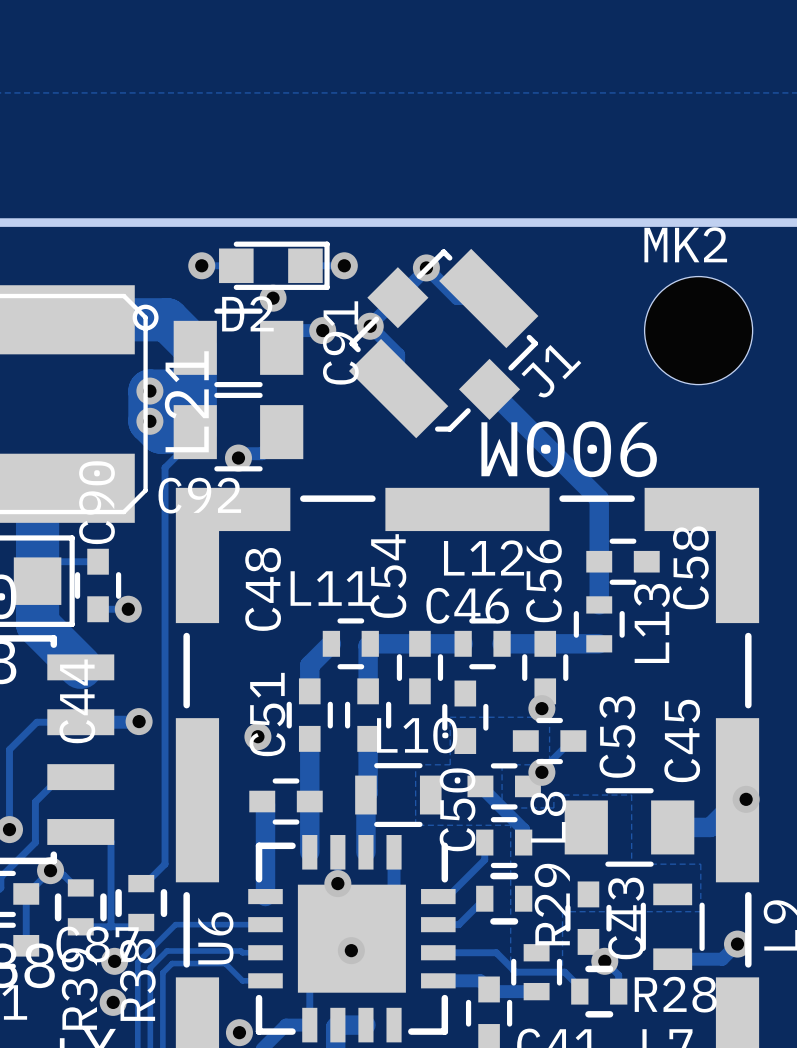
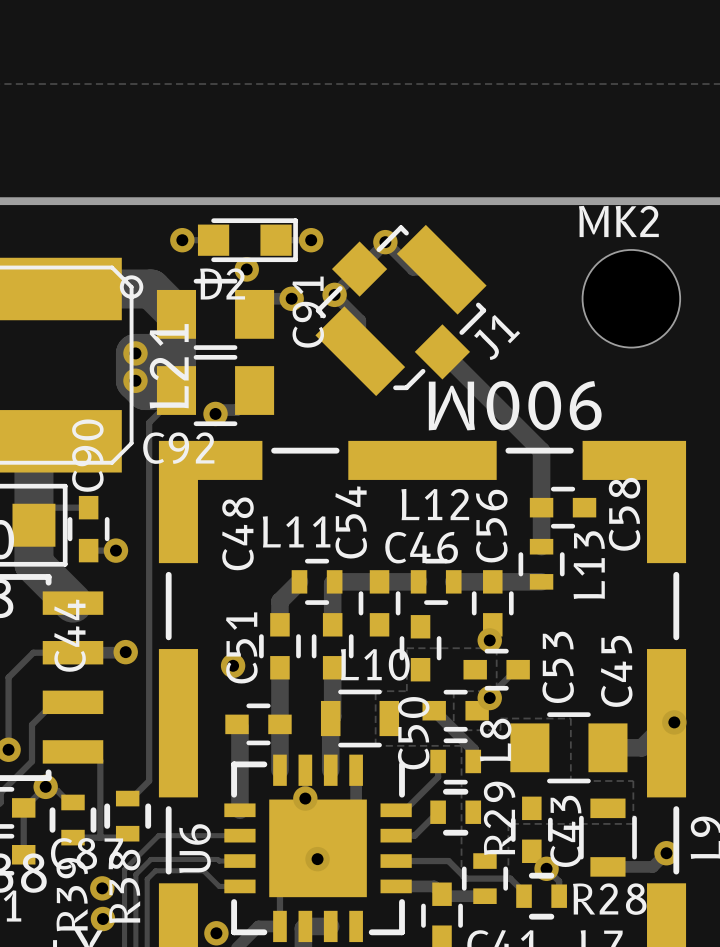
via: (114, 961) -> none
via: none -> (102, 888)
via: (113, 1002) -> none
via: none -> (102, 919)

